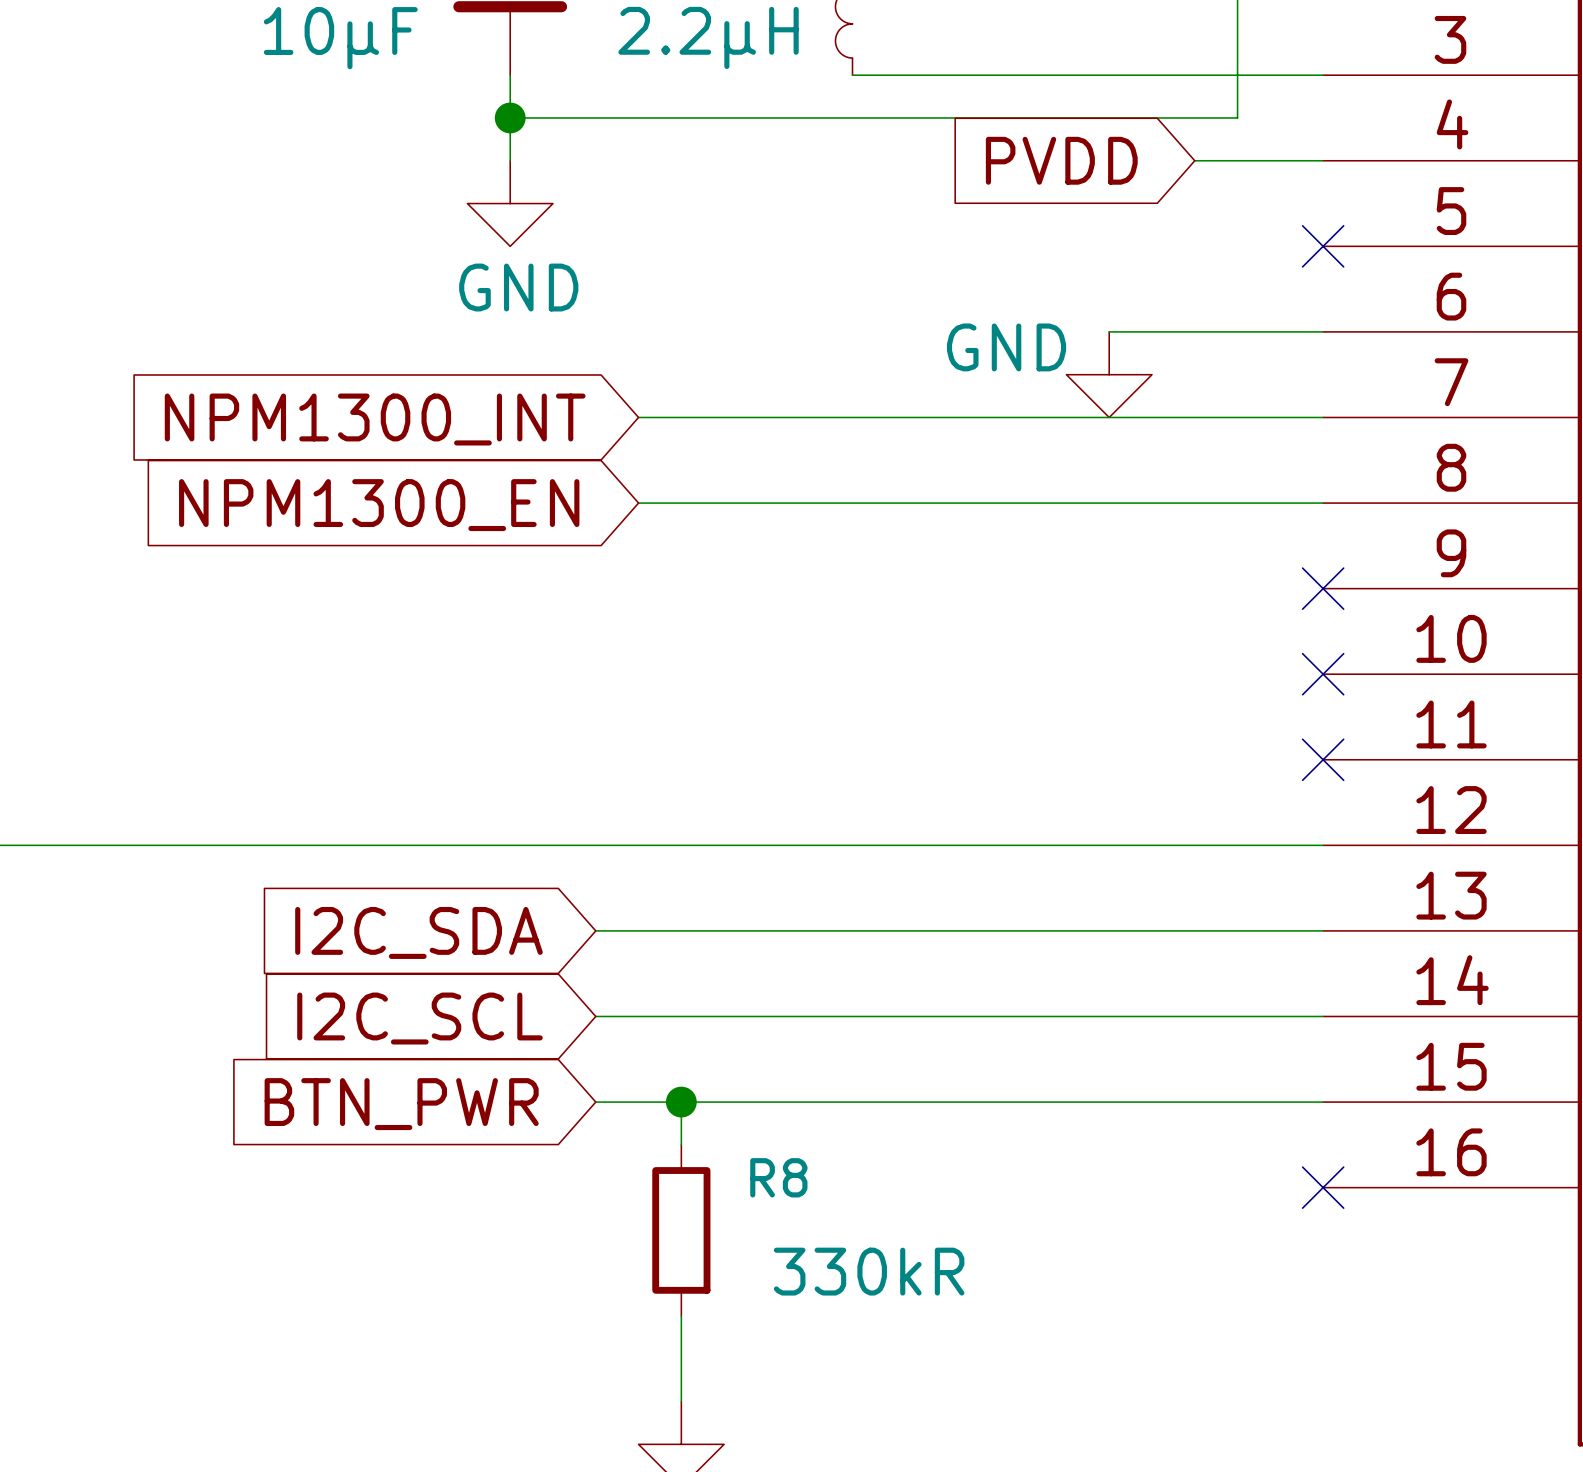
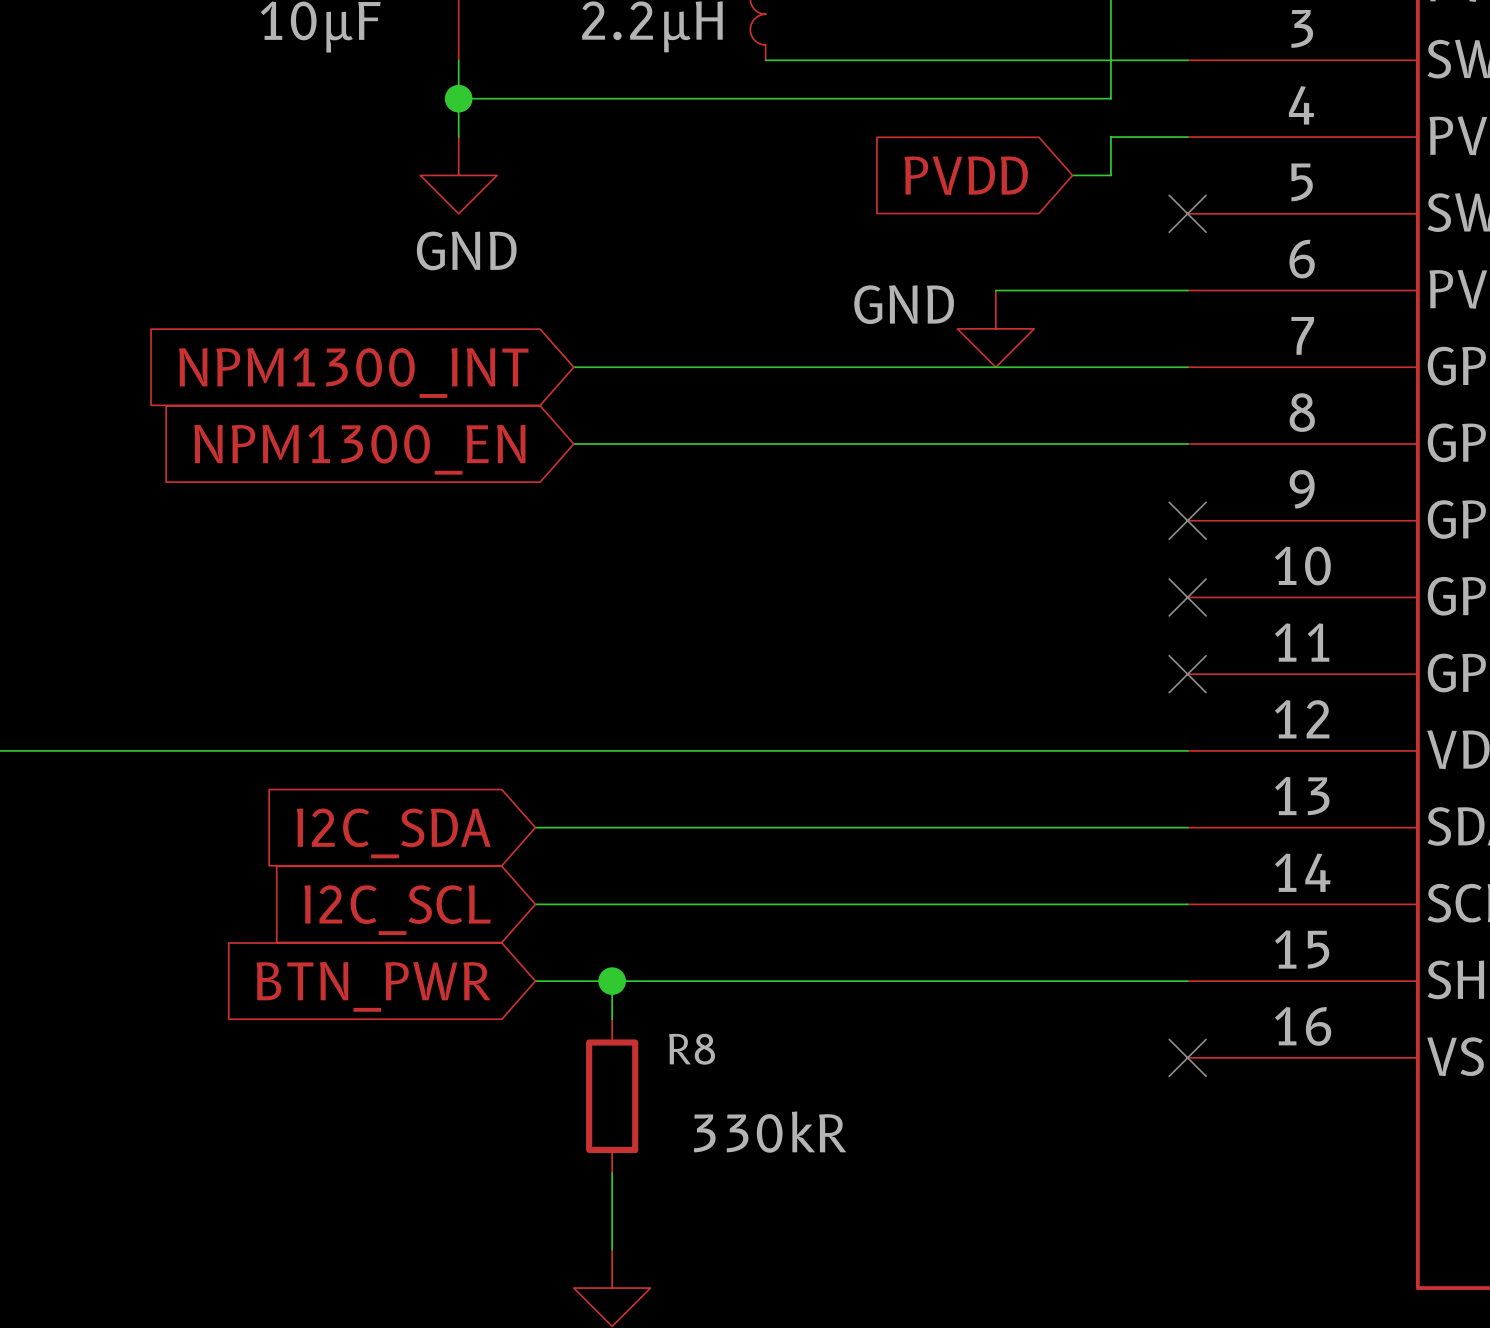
global label position: PVDD (1061, 160) -> PVDD (966, 175)
wire: (1194, 160) (1237, 160) -> (1072, 175) (1110, 175) (1110, 137)

